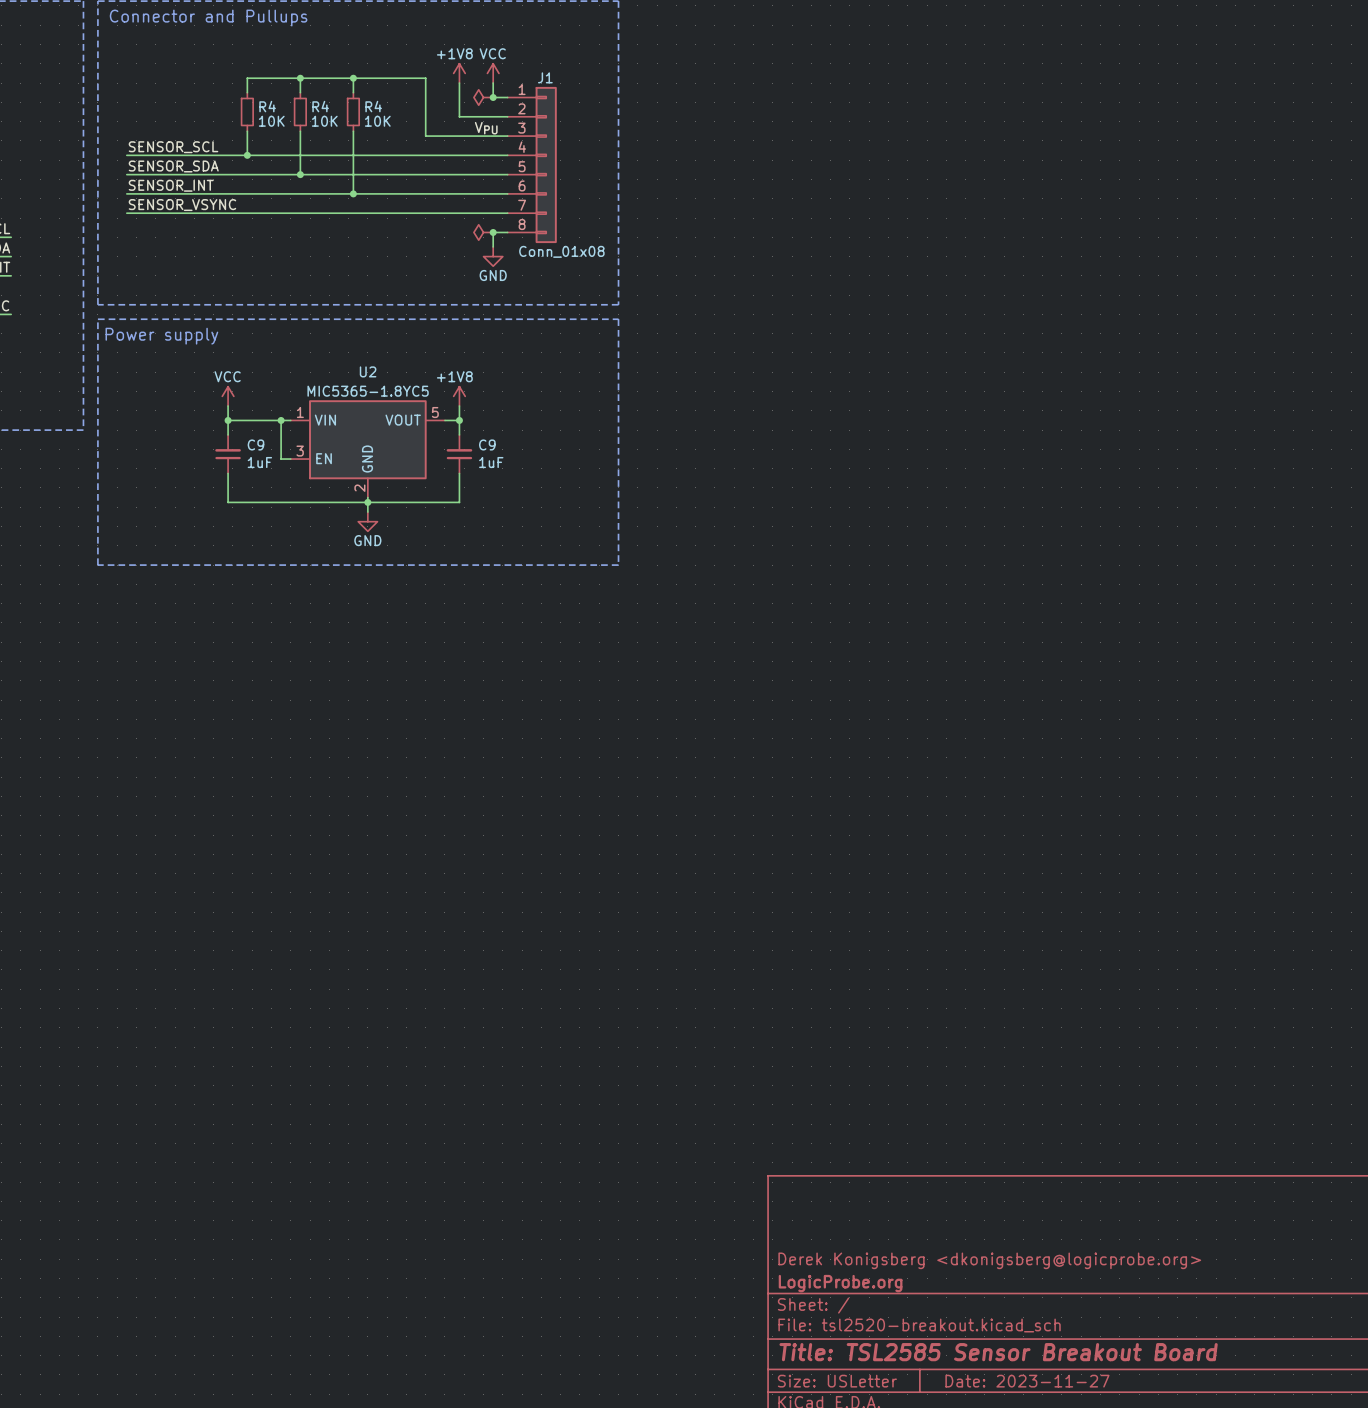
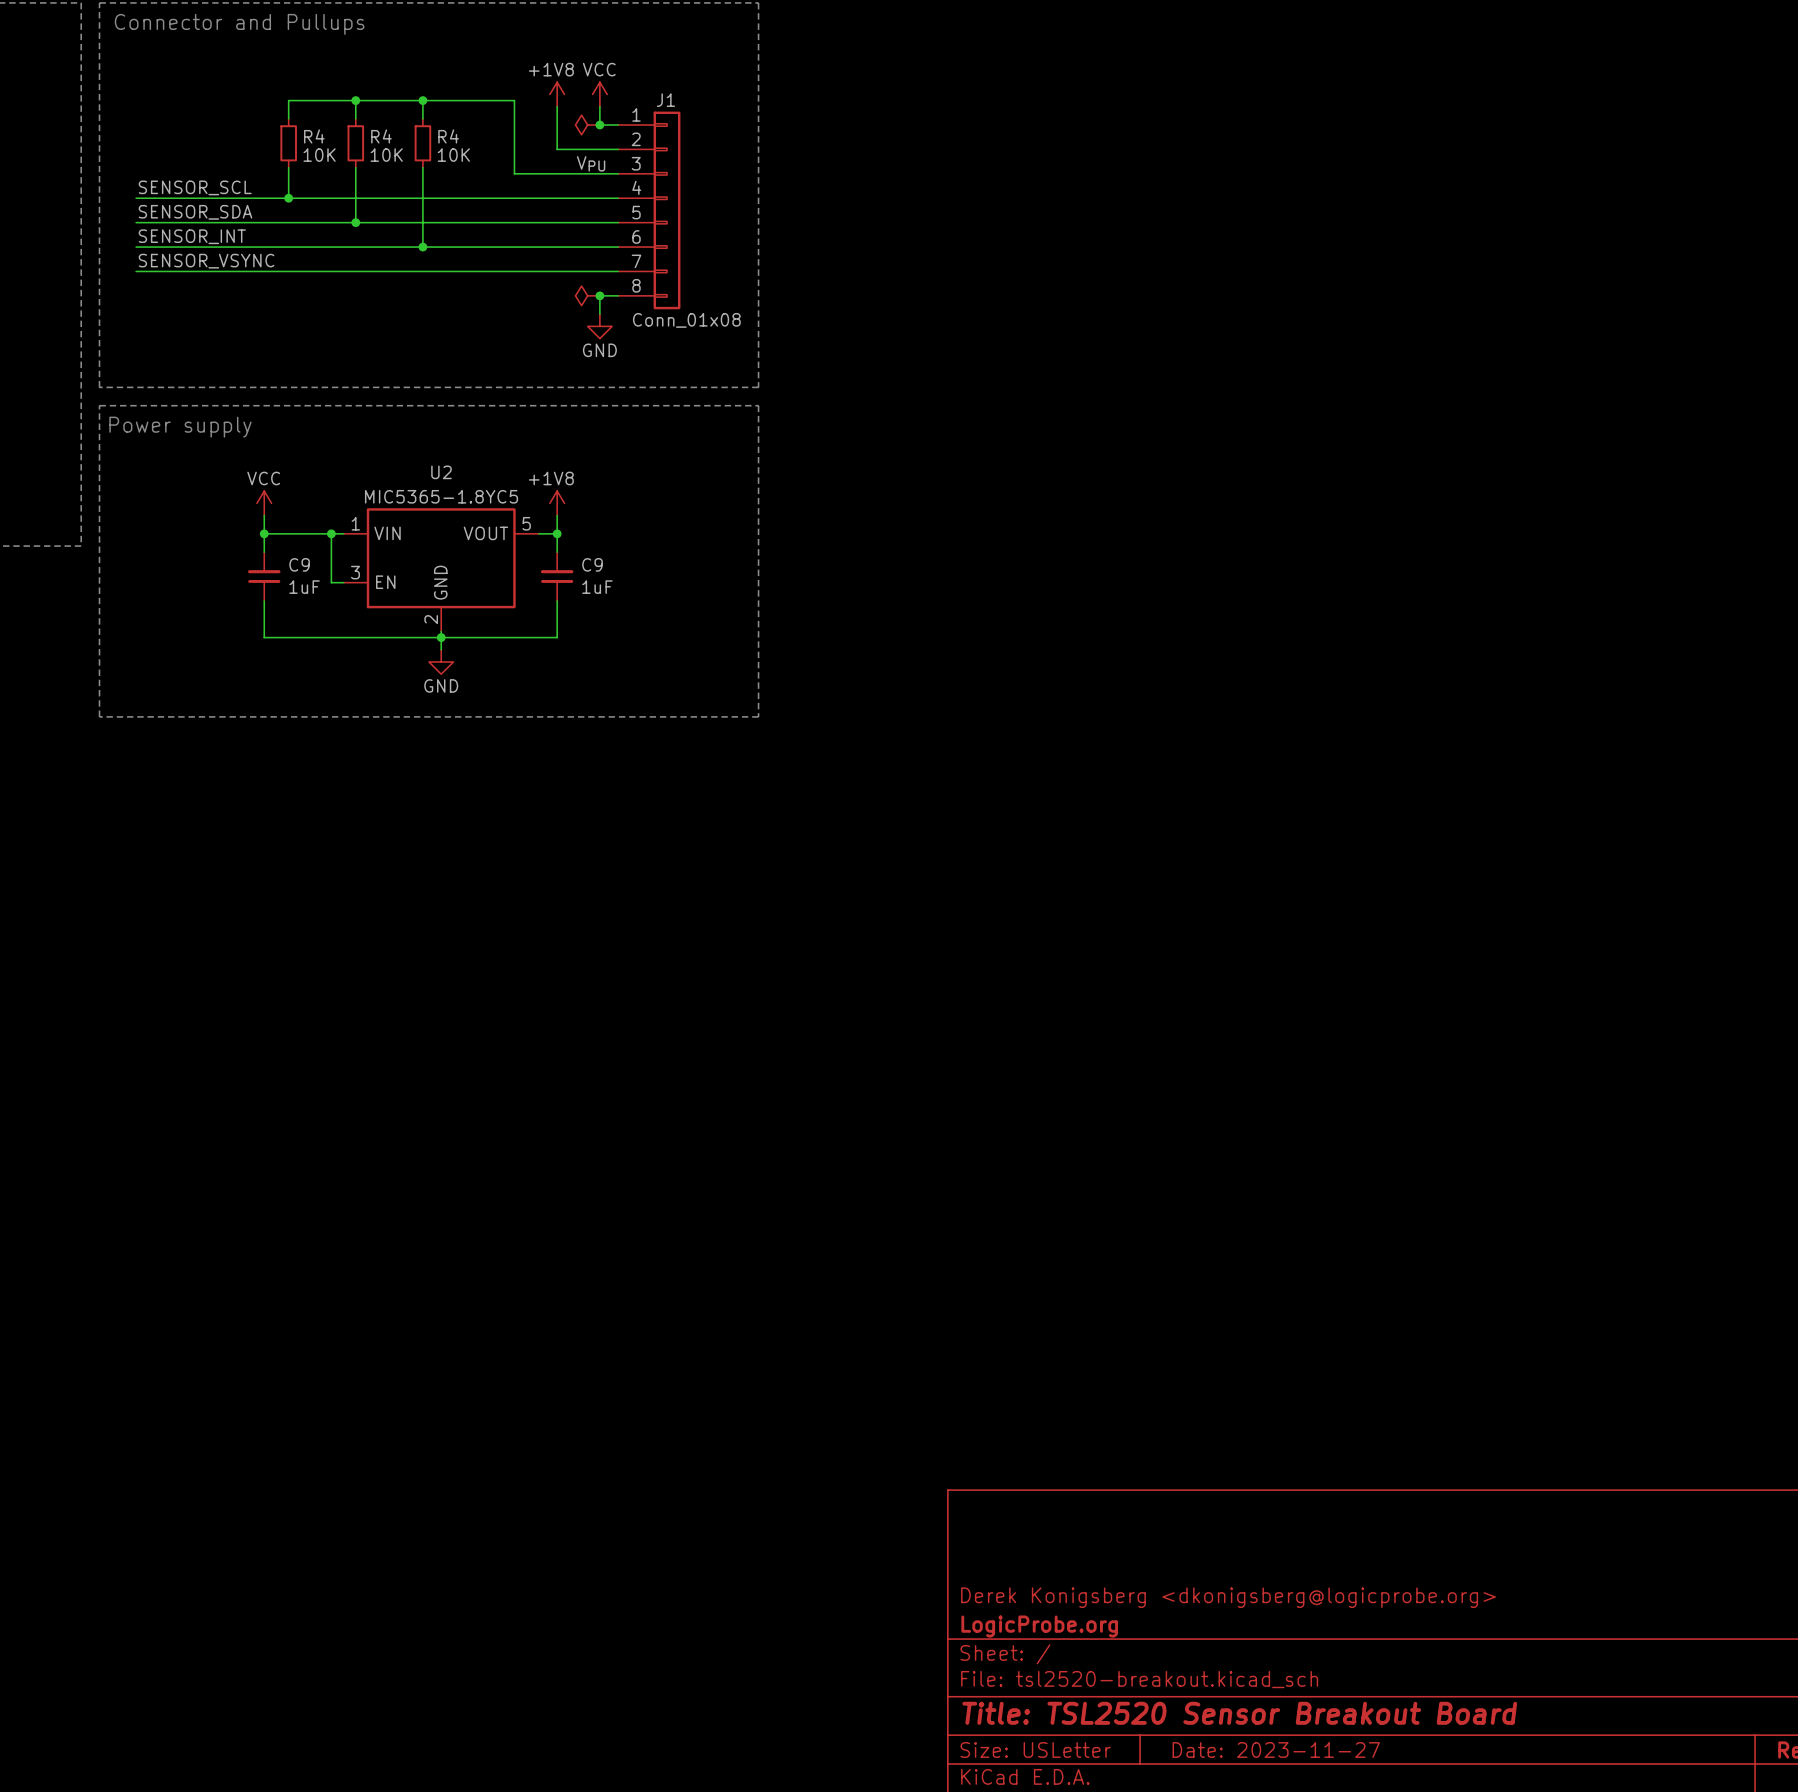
title block: Title: TSL2585 Sensor Breakout Board (998, 1352) -> Title: TSL2520 Sensor Breakout Board (1239, 1713)

